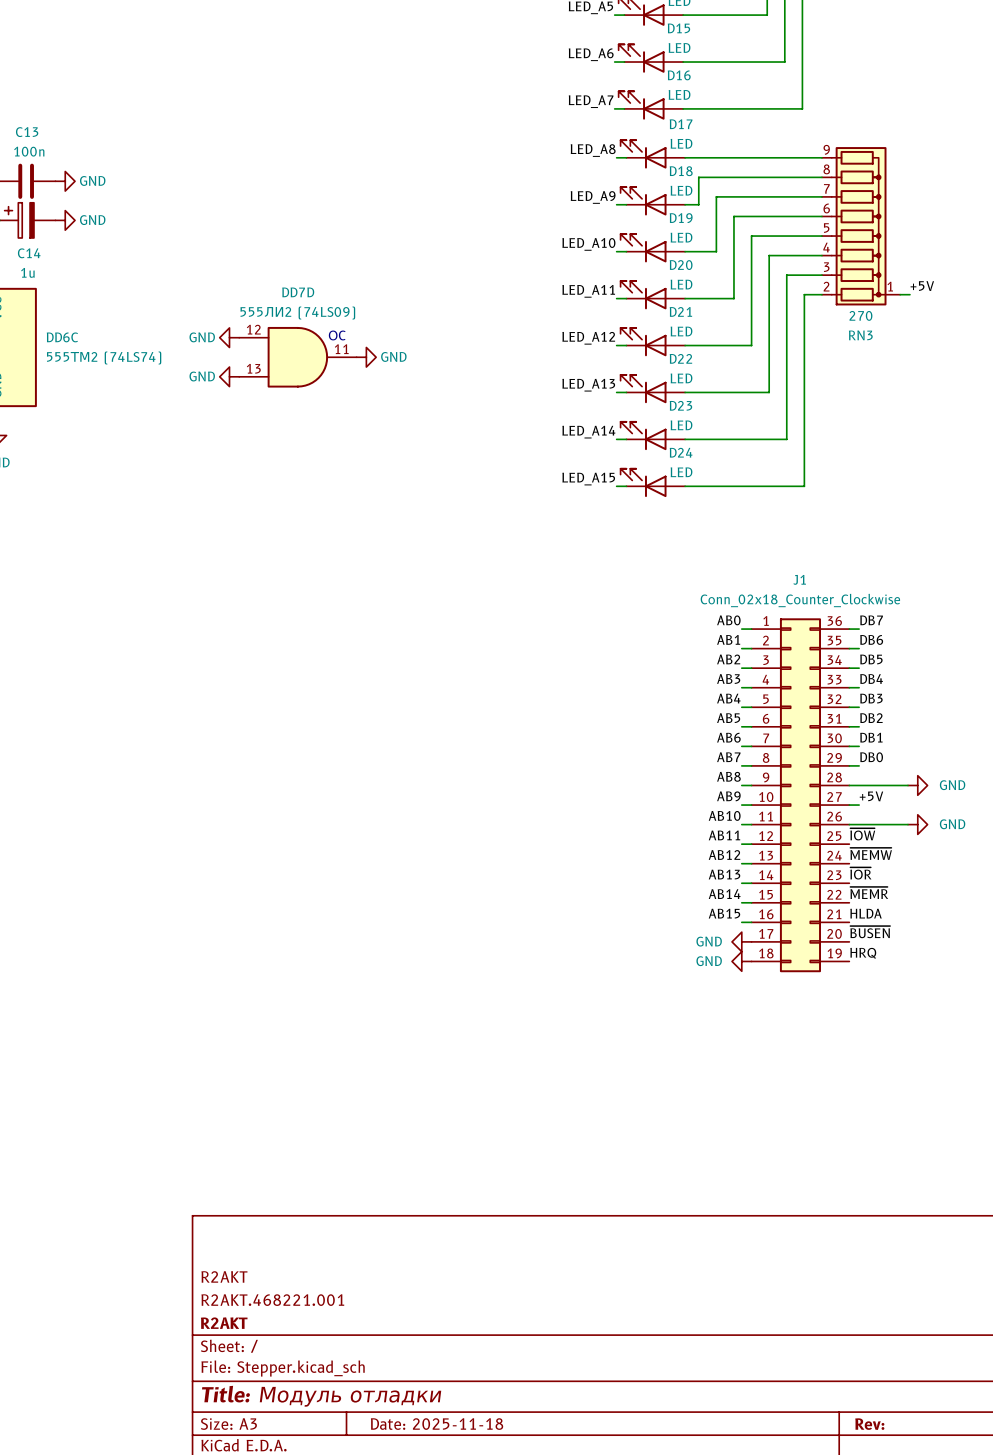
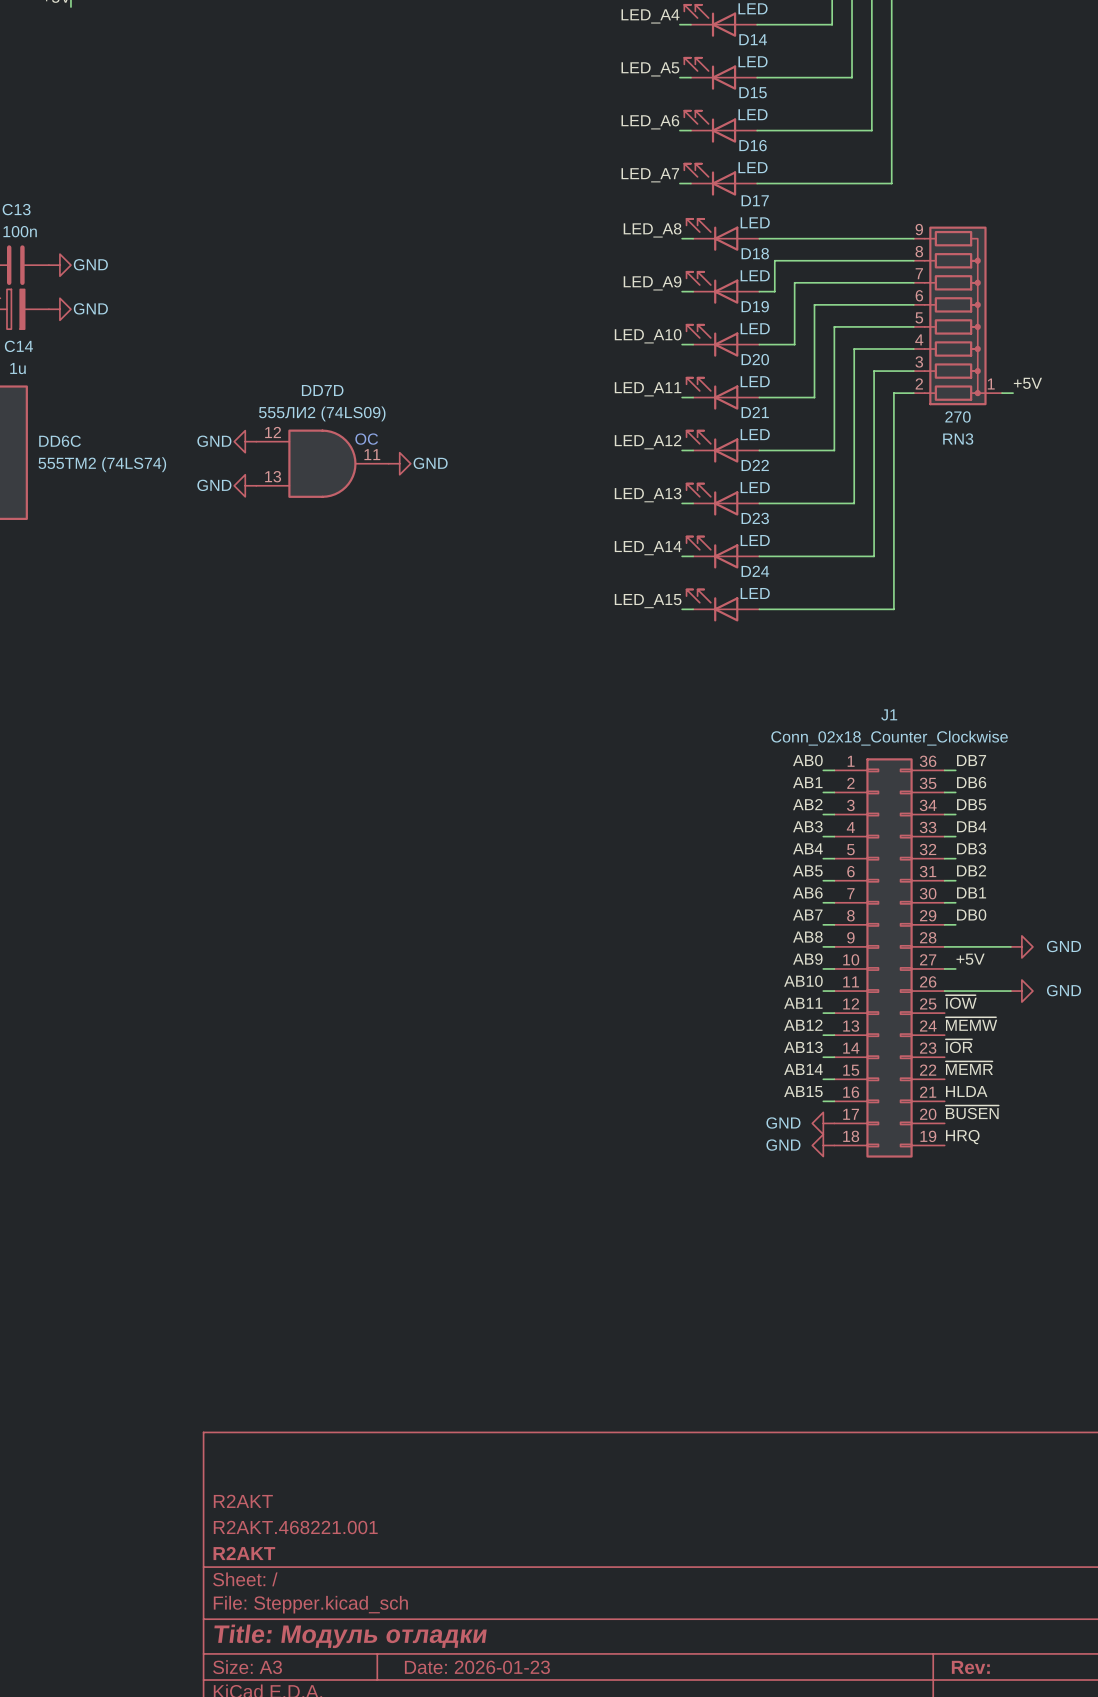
title block: Date: 2025-11-18 (437, 1424) -> Date: 2026-01-23 (477, 1667)

